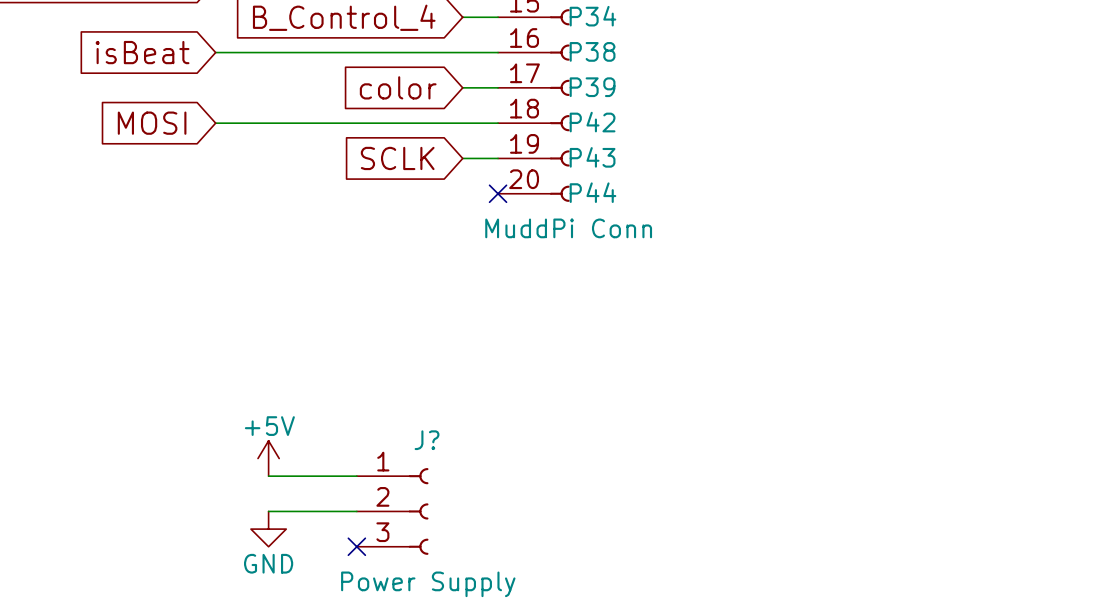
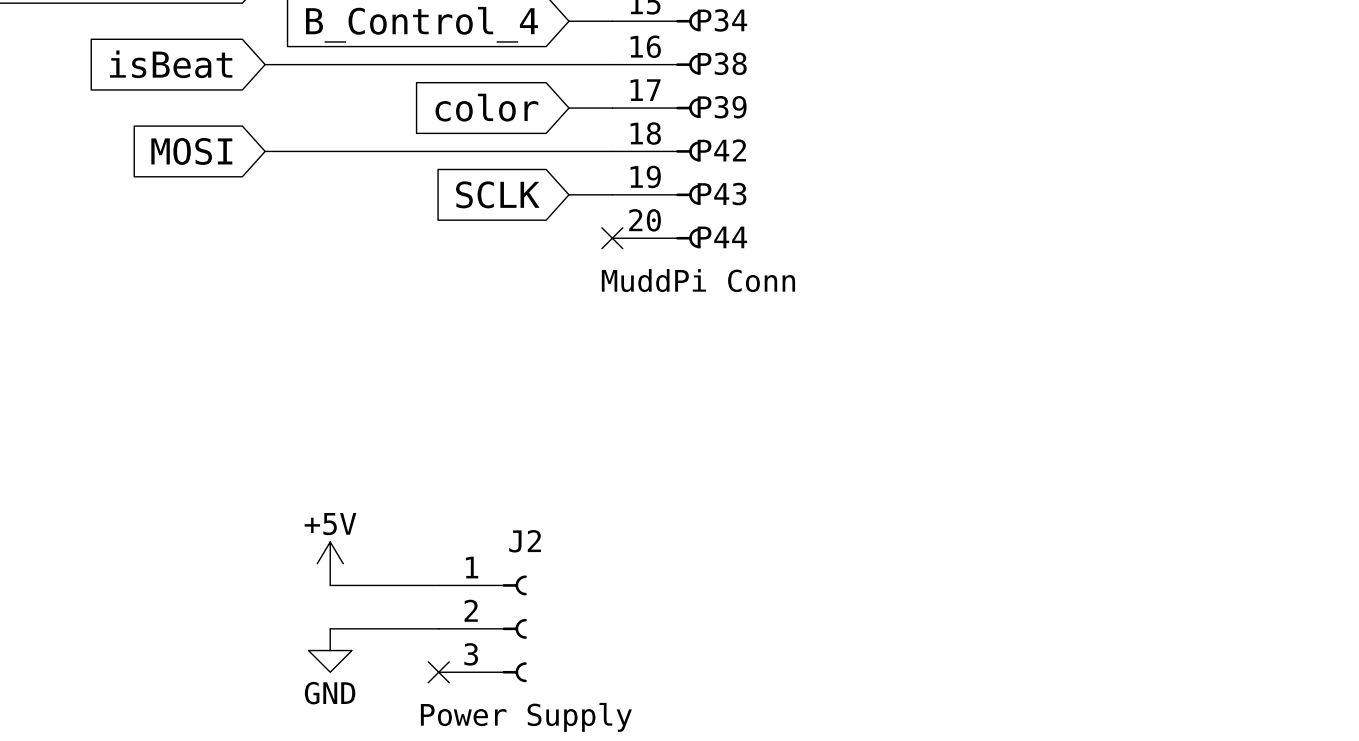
J? name: J? (427, 440) -> J2 (525, 541)

